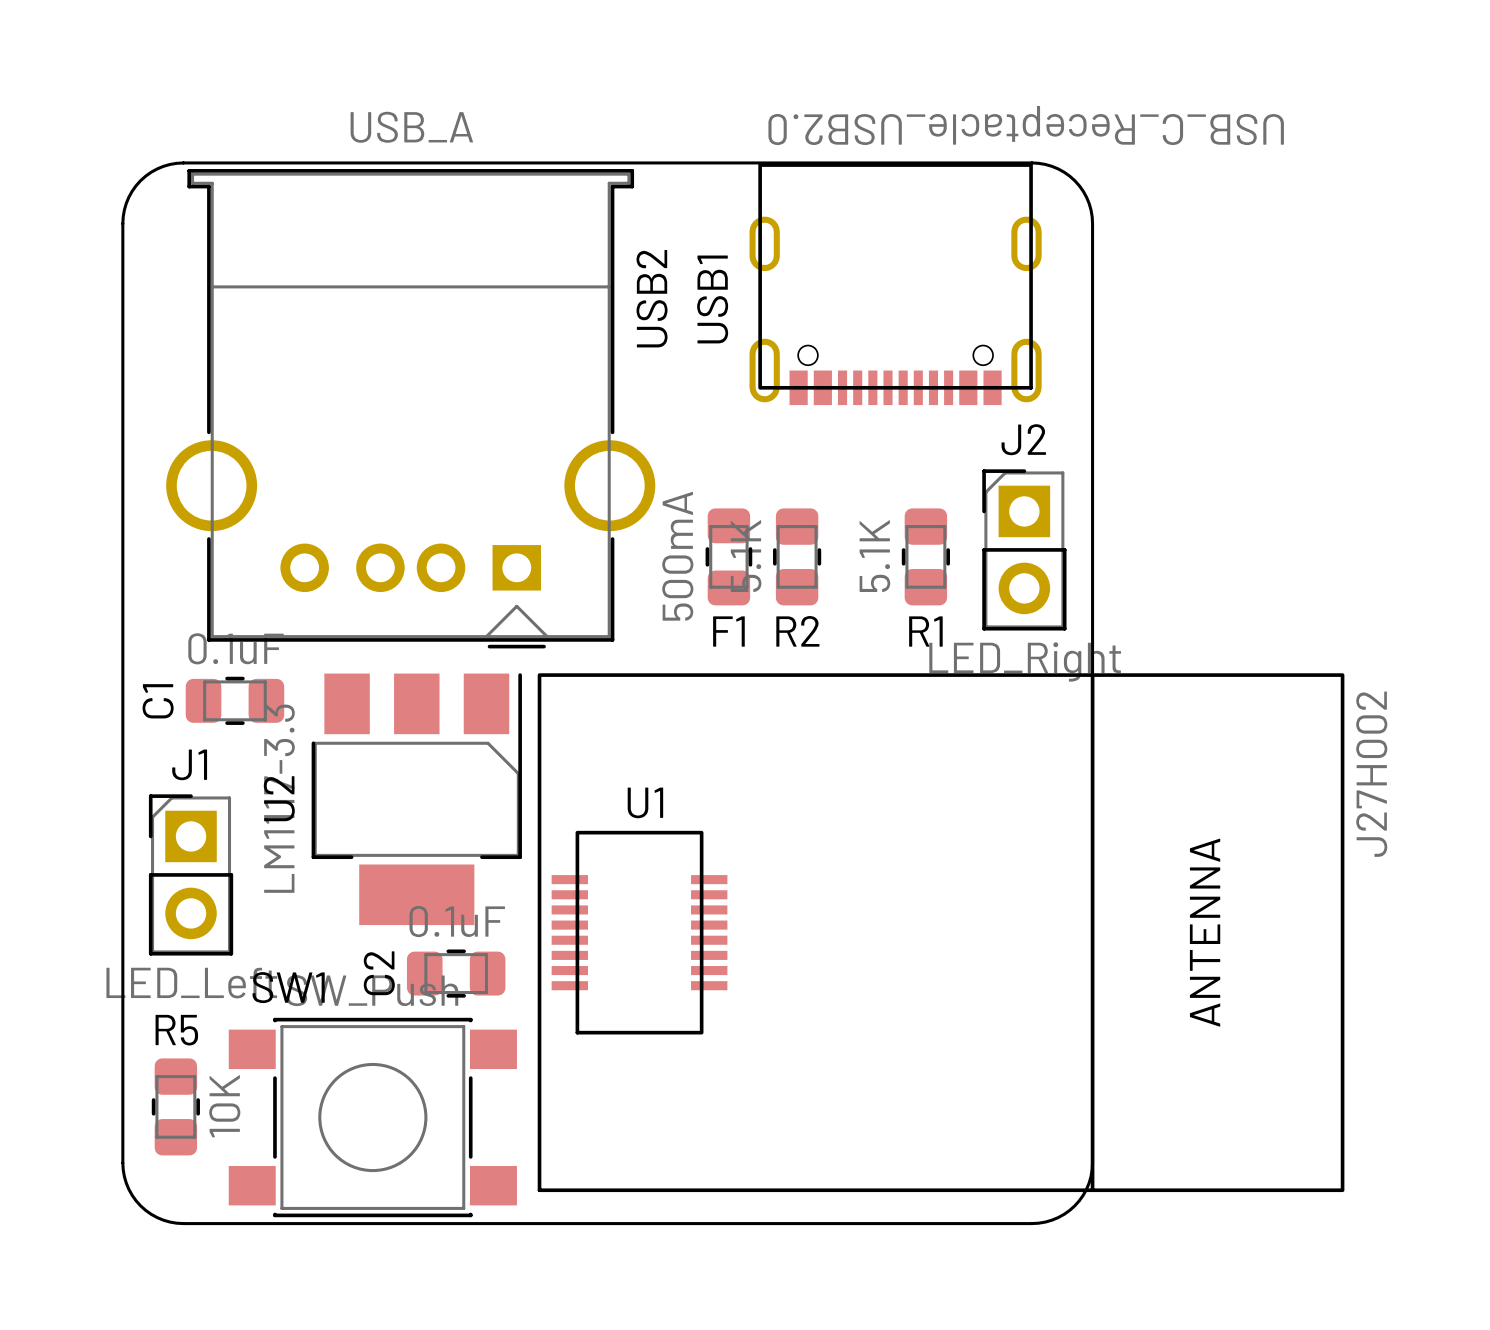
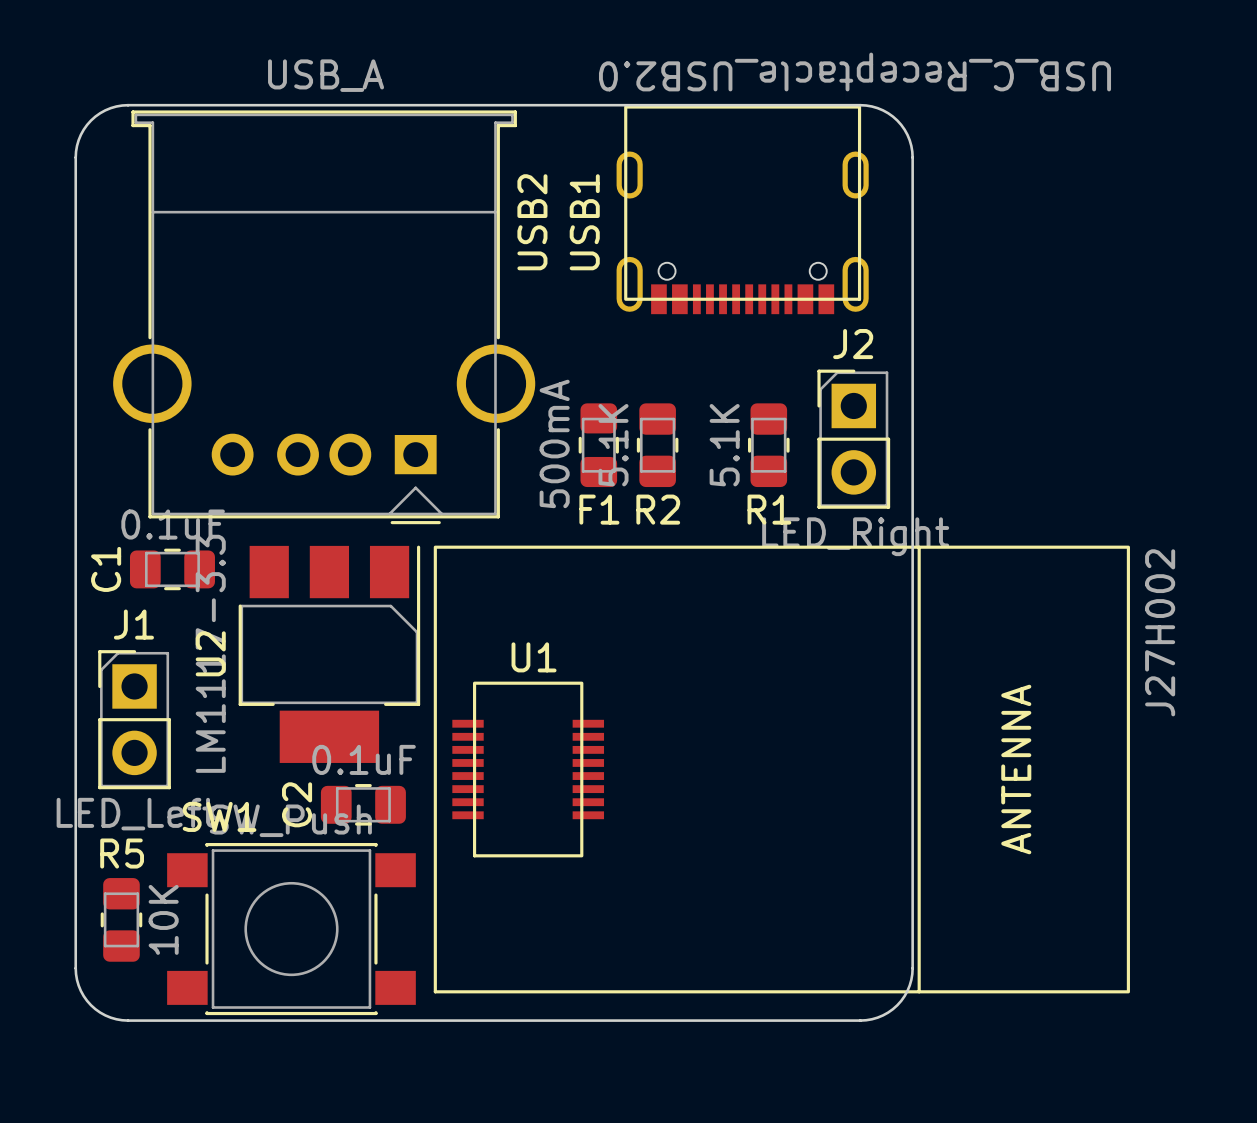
U1 footprint: [537, 673, 1345, 1193] -> [433, 545, 1130, 994]

